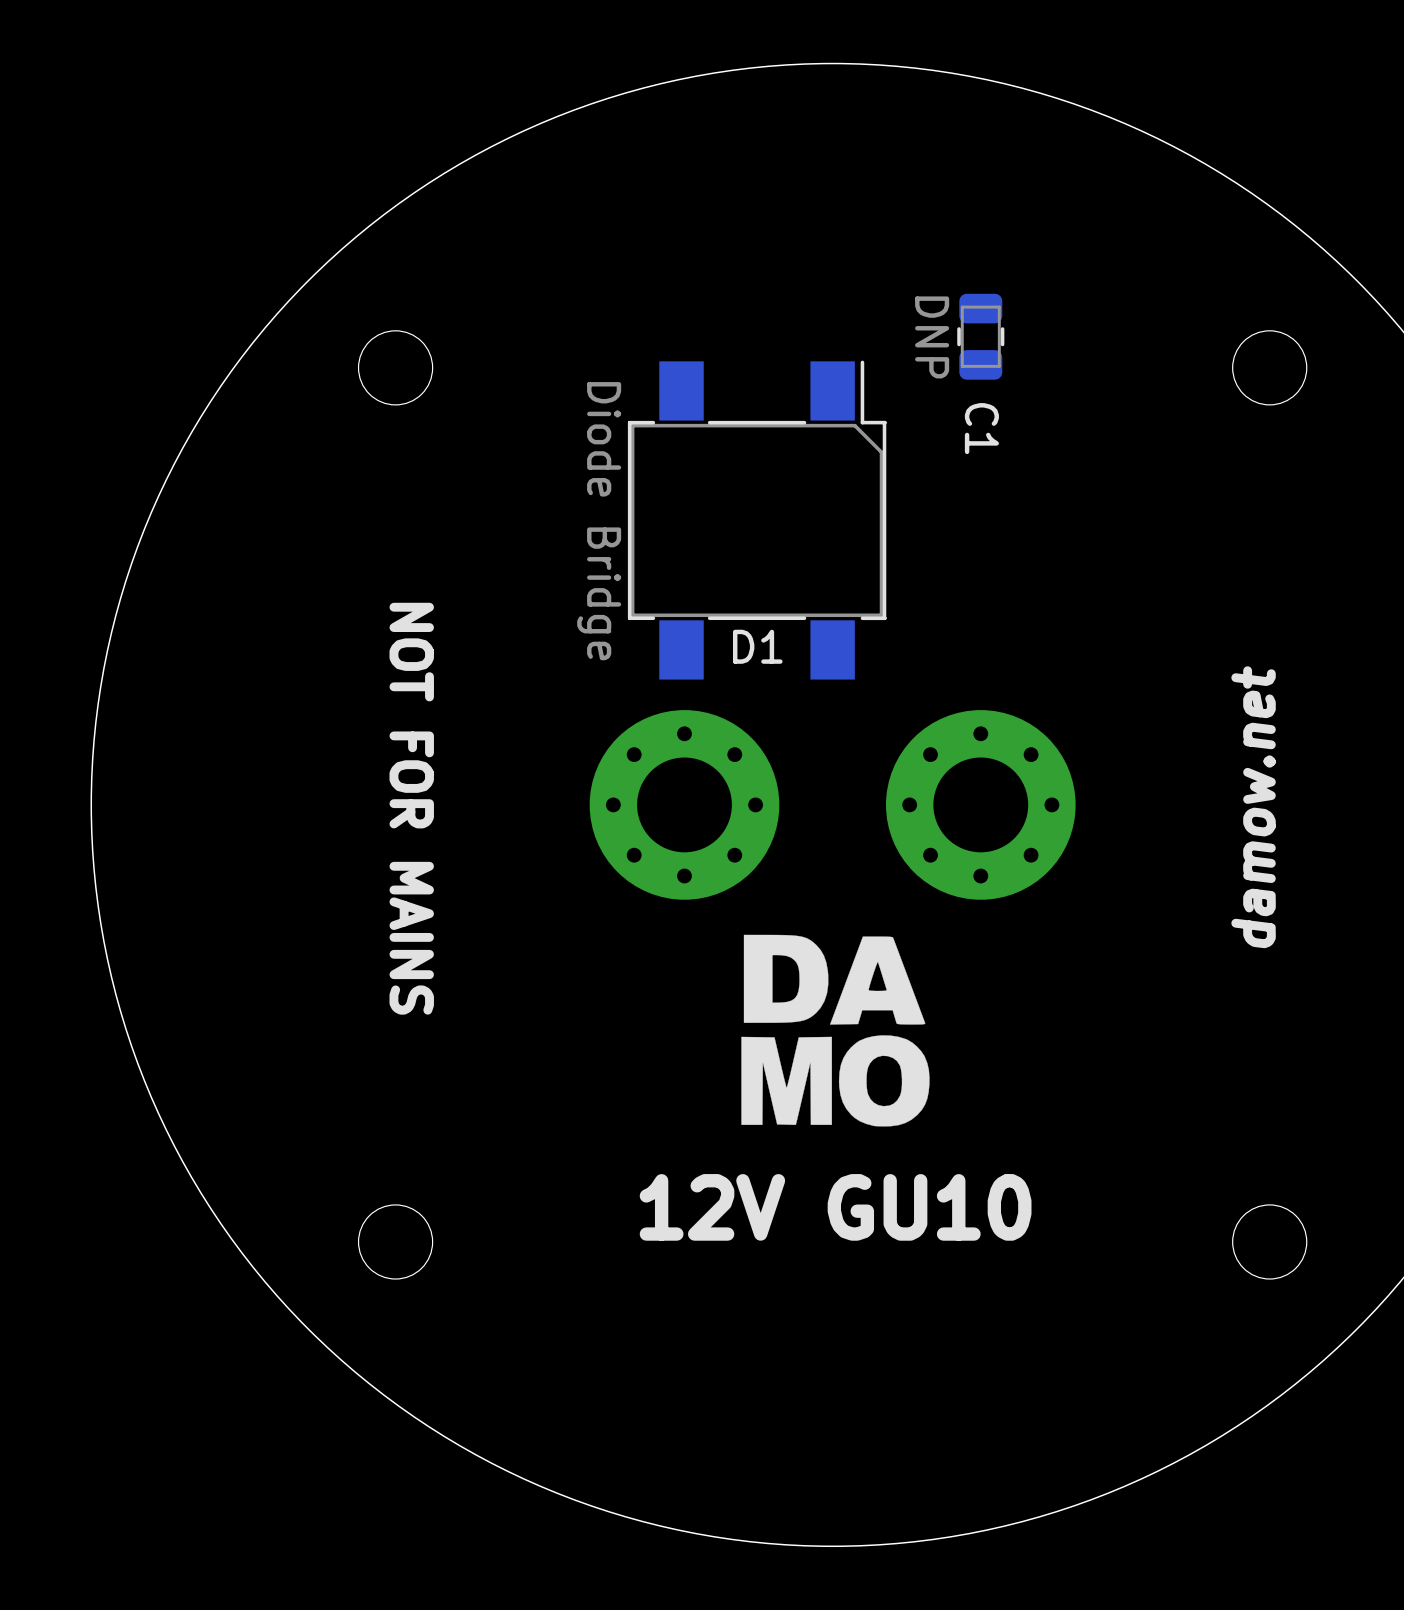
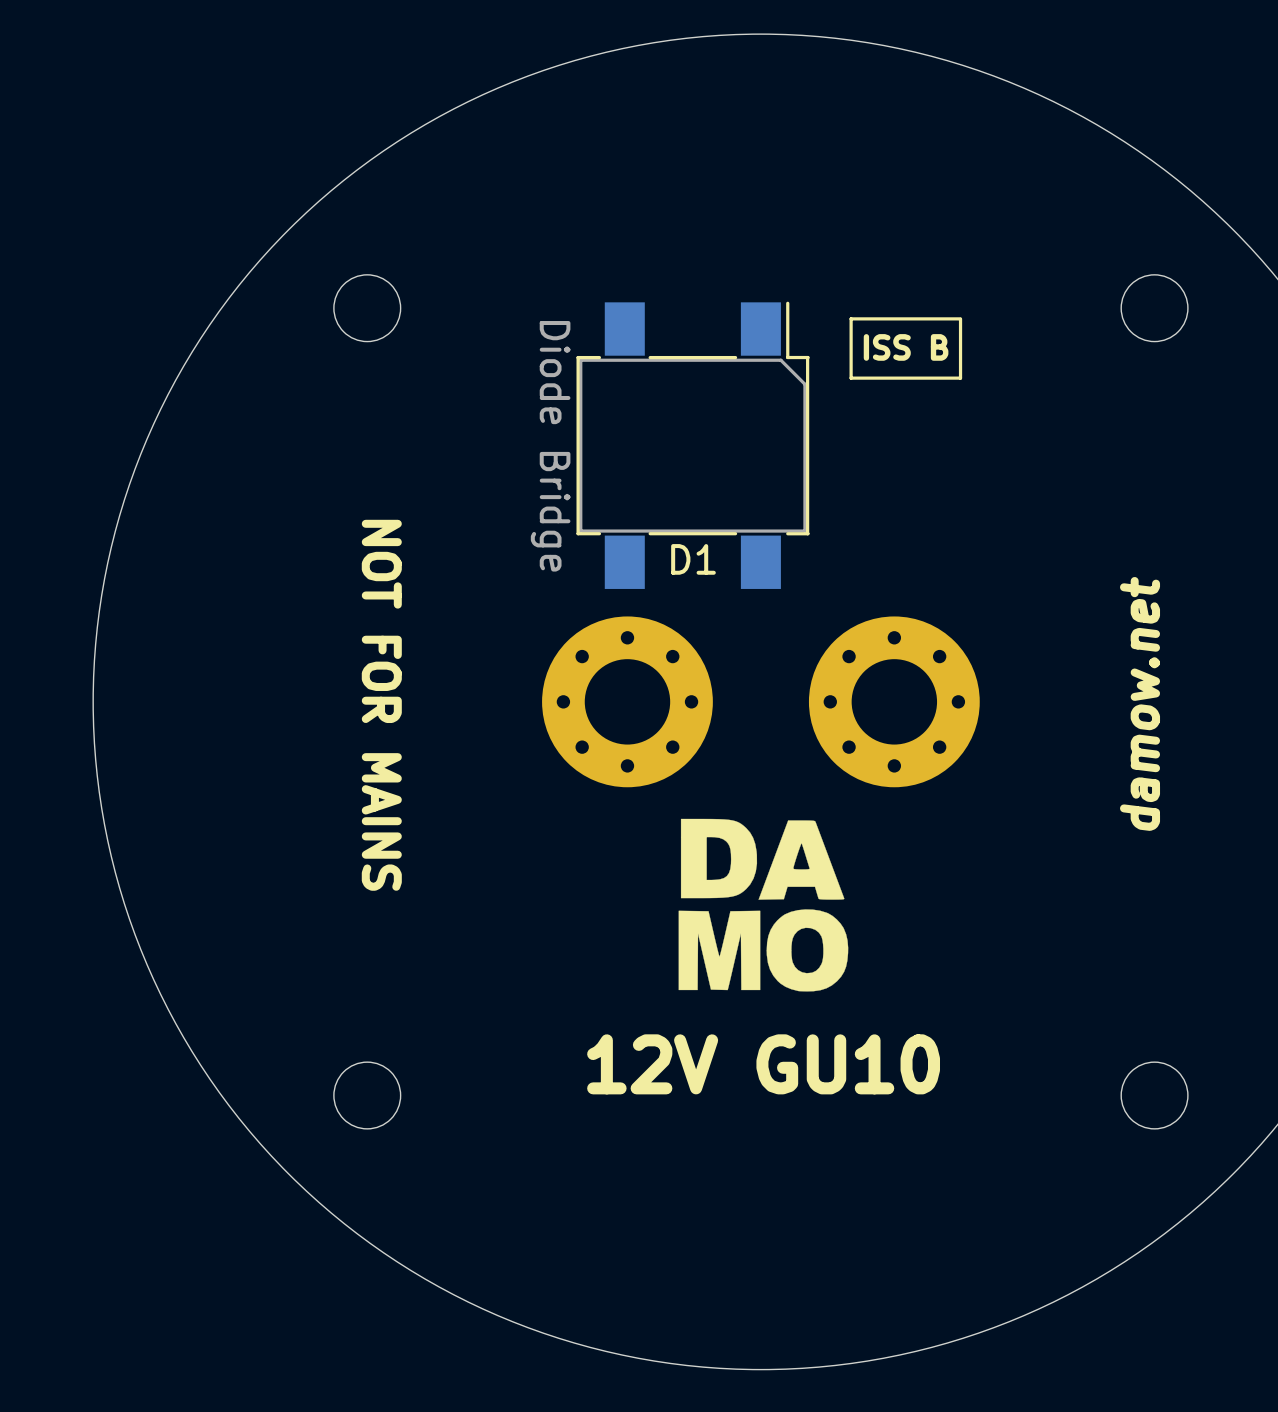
C1: DNP (980, 336) -> none
line: none -> (960, 318) (851, 318) (851, 378) (960, 378) (960, 319)
text: none -> ISS B (906, 347)

